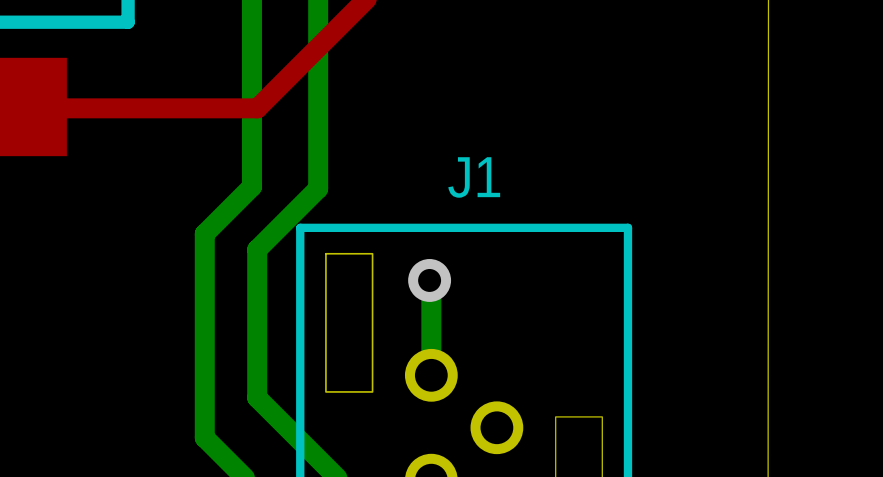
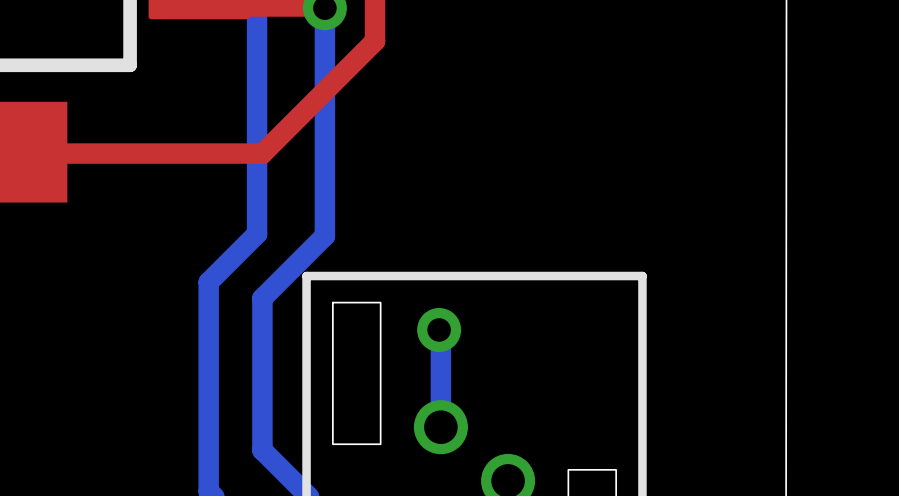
J1 name: J1 (474, 177) -> none

